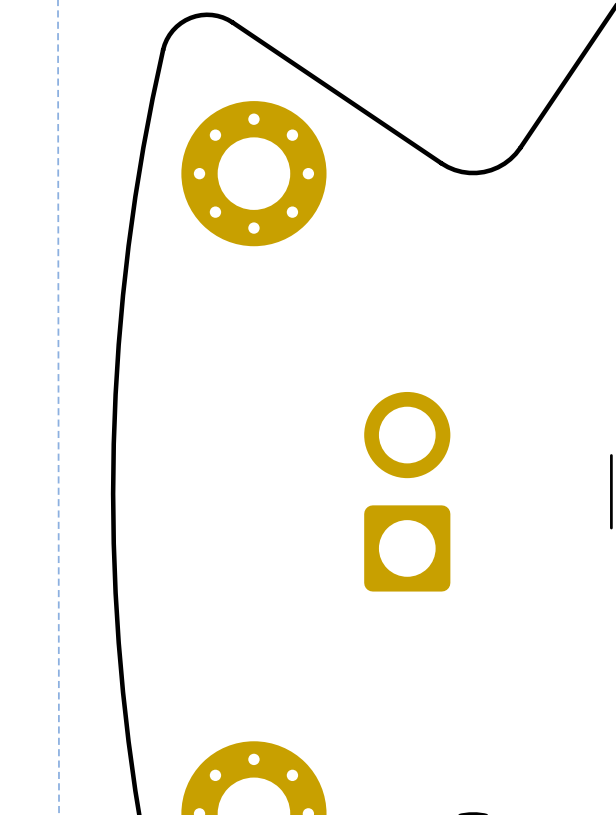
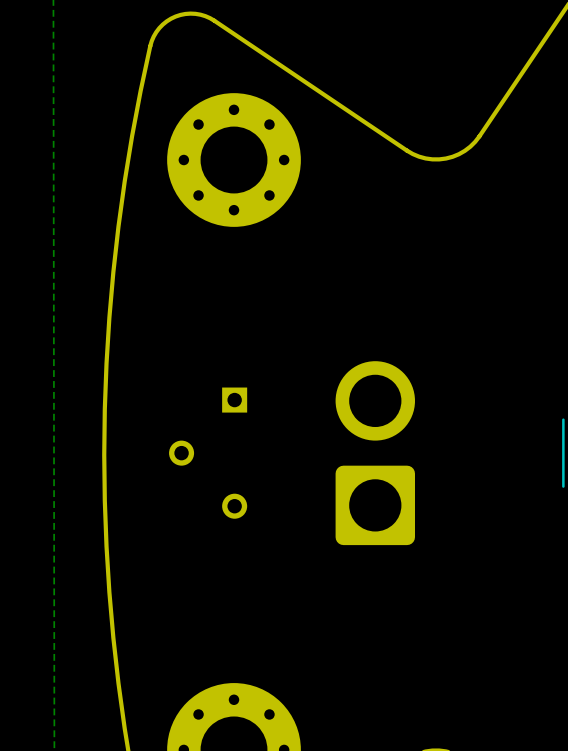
part: none -> (208, 453)

